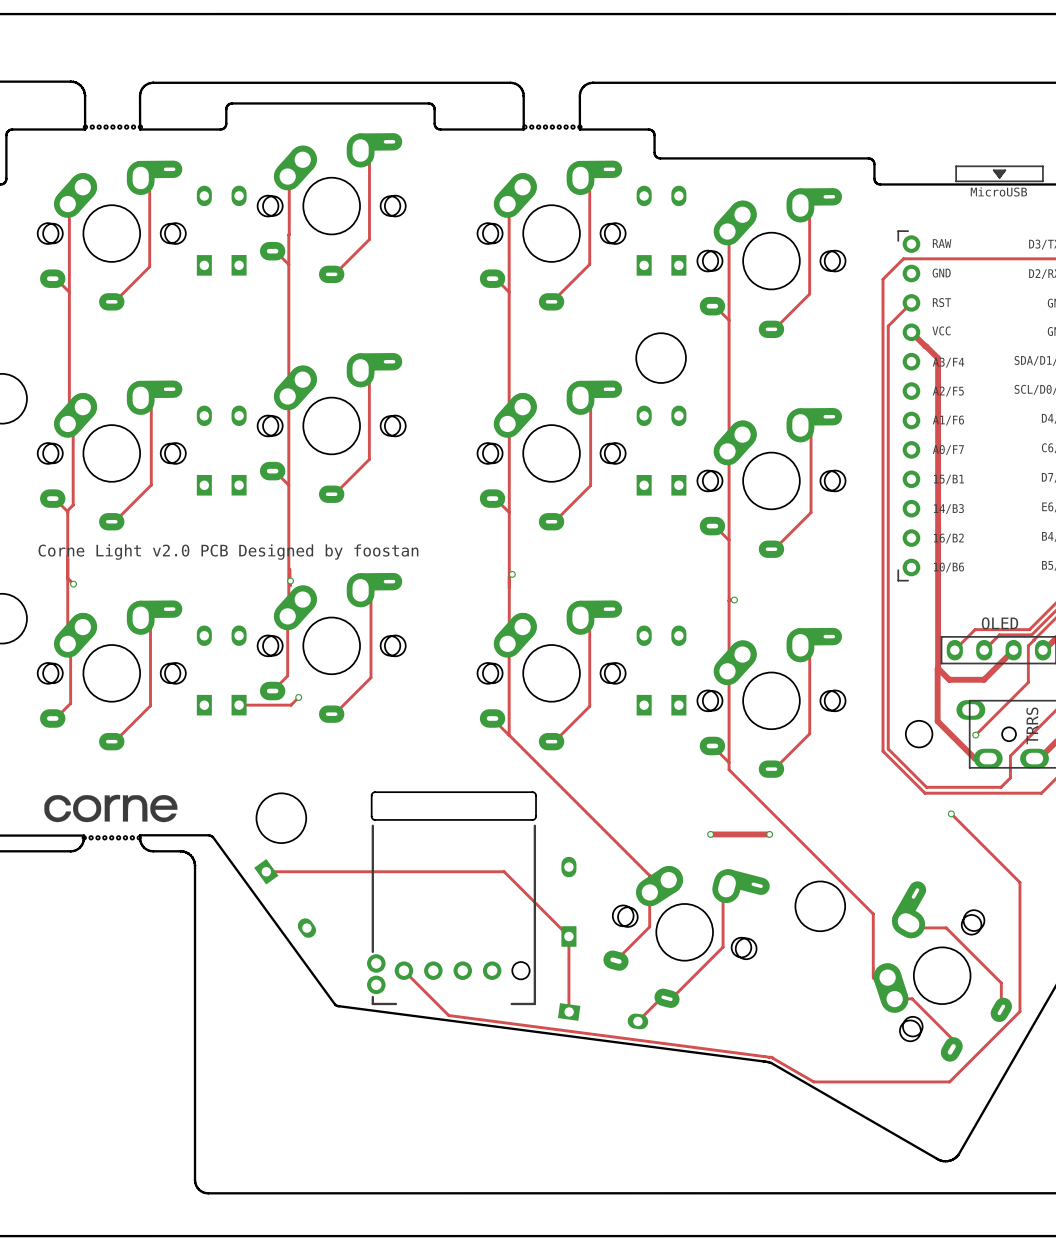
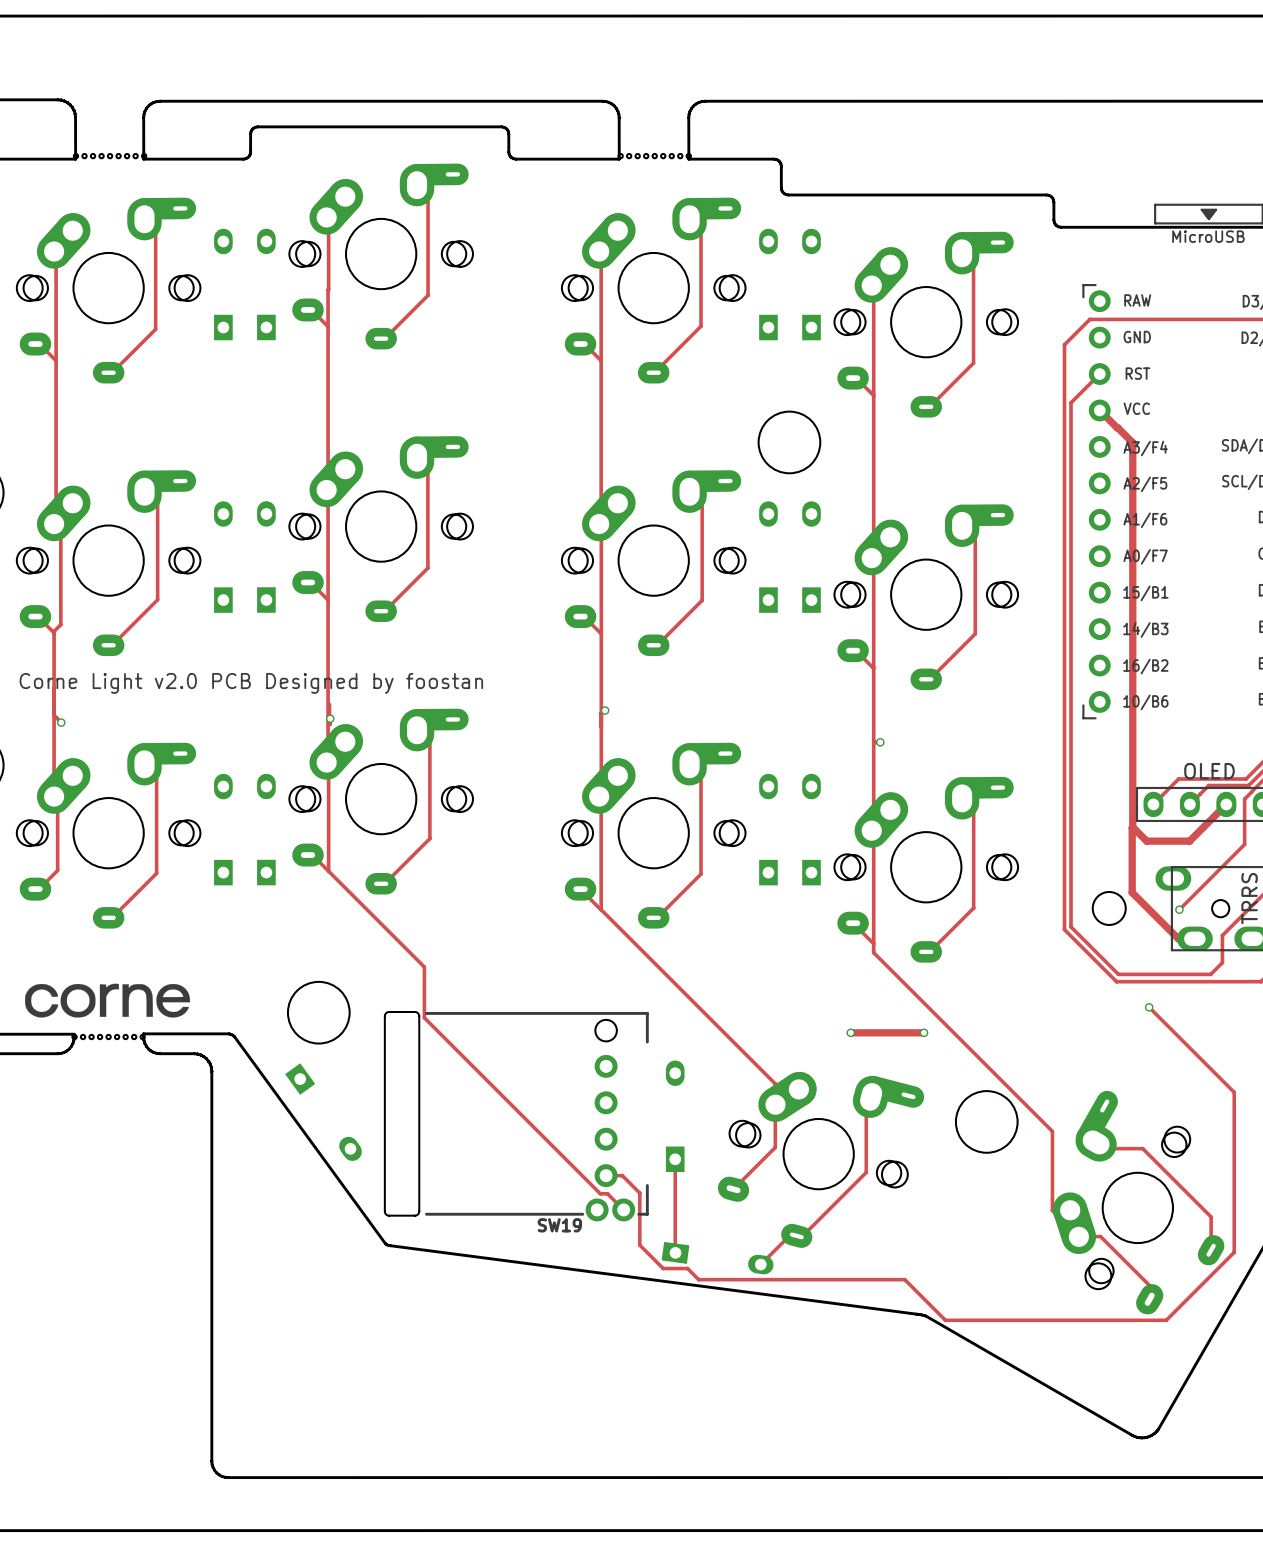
track: (287, 616) (287, 675) (272, 691) -> none
track: none -> (328, 764) (328, 871)
track: none -> (312, 855) (424, 967) (424, 1017) (600, 1193) (607, 1193) (623, 1209)
track: (298, 697) (291, 705) (239, 705) -> none
via: (298, 697) -> none
track: (266, 871) (504, 871) (568, 936) -> none
part: (451, 898) -> none
SW19: none -> (516, 1116)
track: (403, 970) (448, 1015) (764, 1056) -> none
track: (764, 1056) (772, 1057) (813, 1081) (949, 1081) (965, 1066) -> (606, 1175) (622, 1175) (639, 1193) (639, 1245) (663, 1268) (687, 1268) (698, 1279) (904, 1279) (945, 1320) (1166, 1320)

